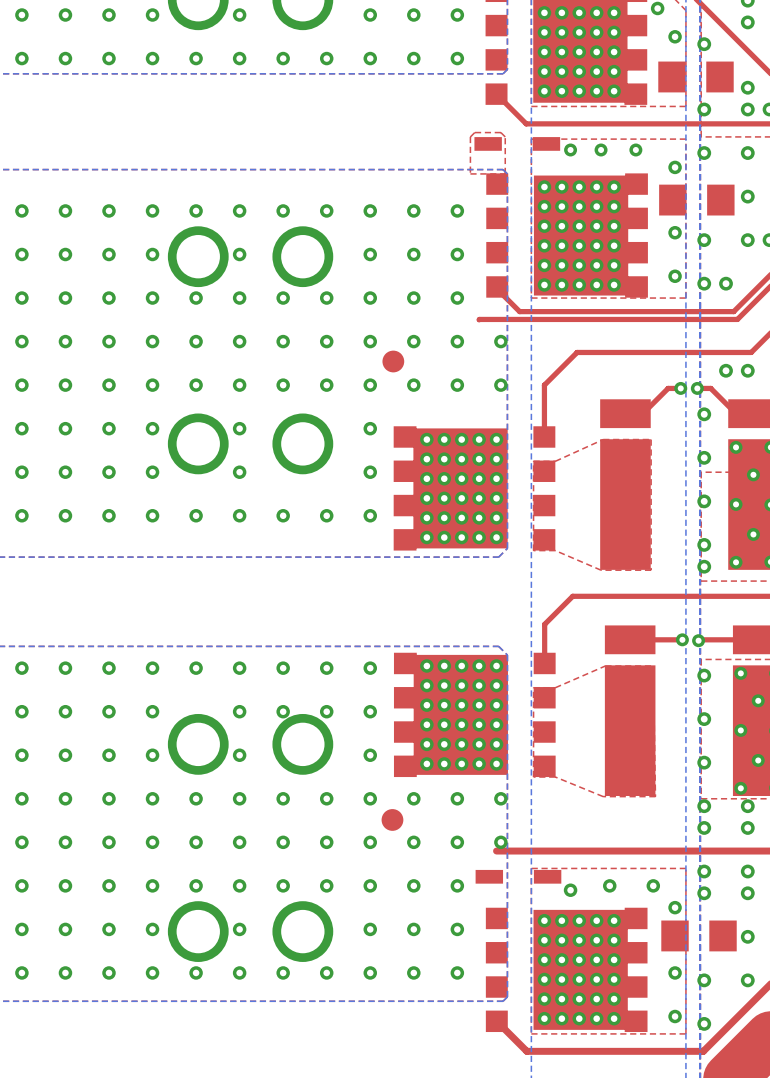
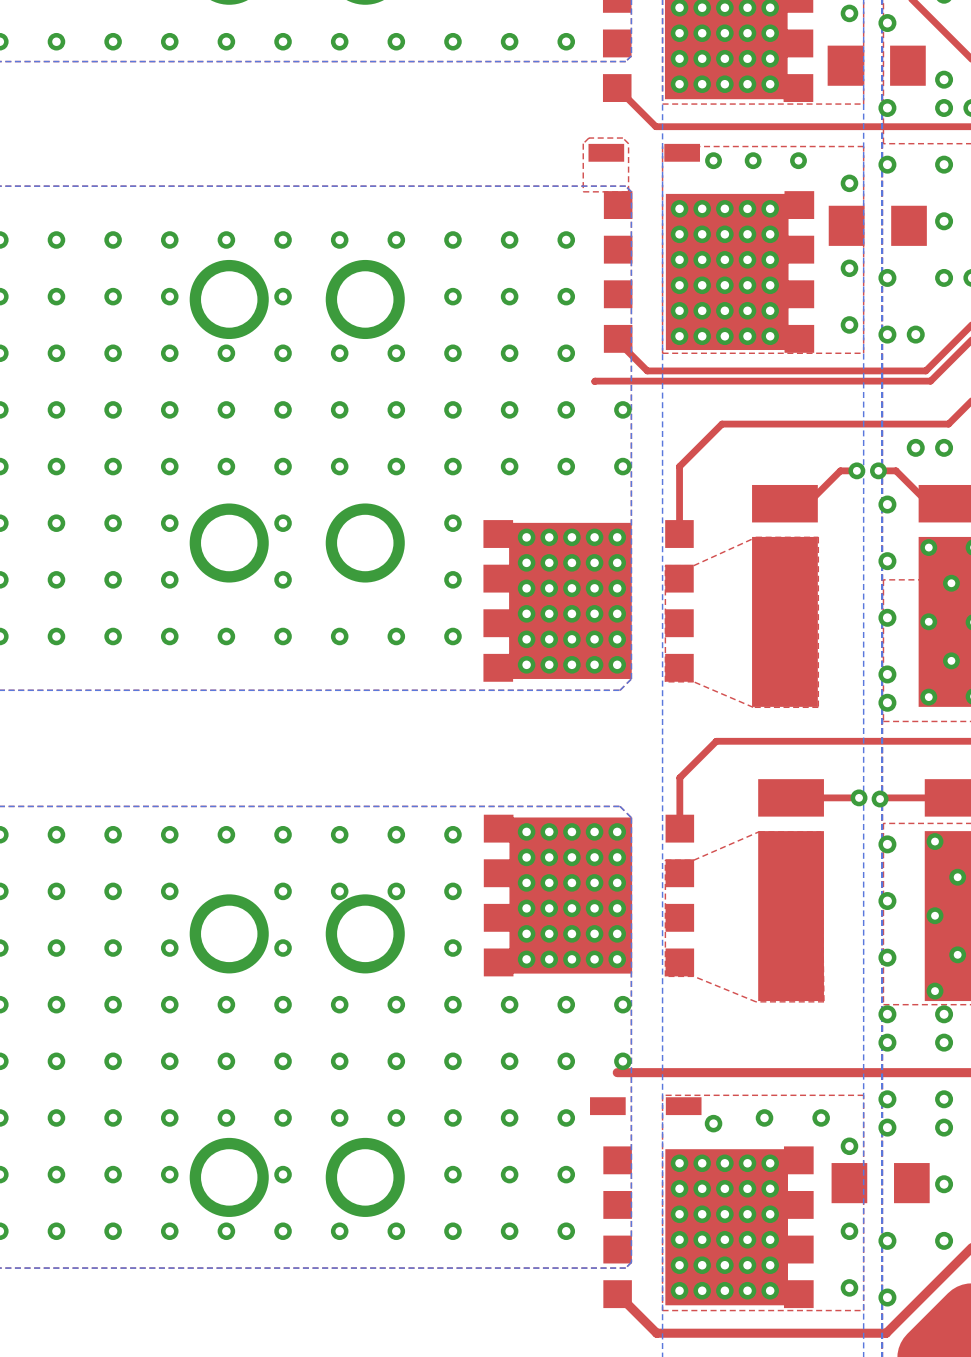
part: (393, 361) -> none
part: (392, 819) -> none

